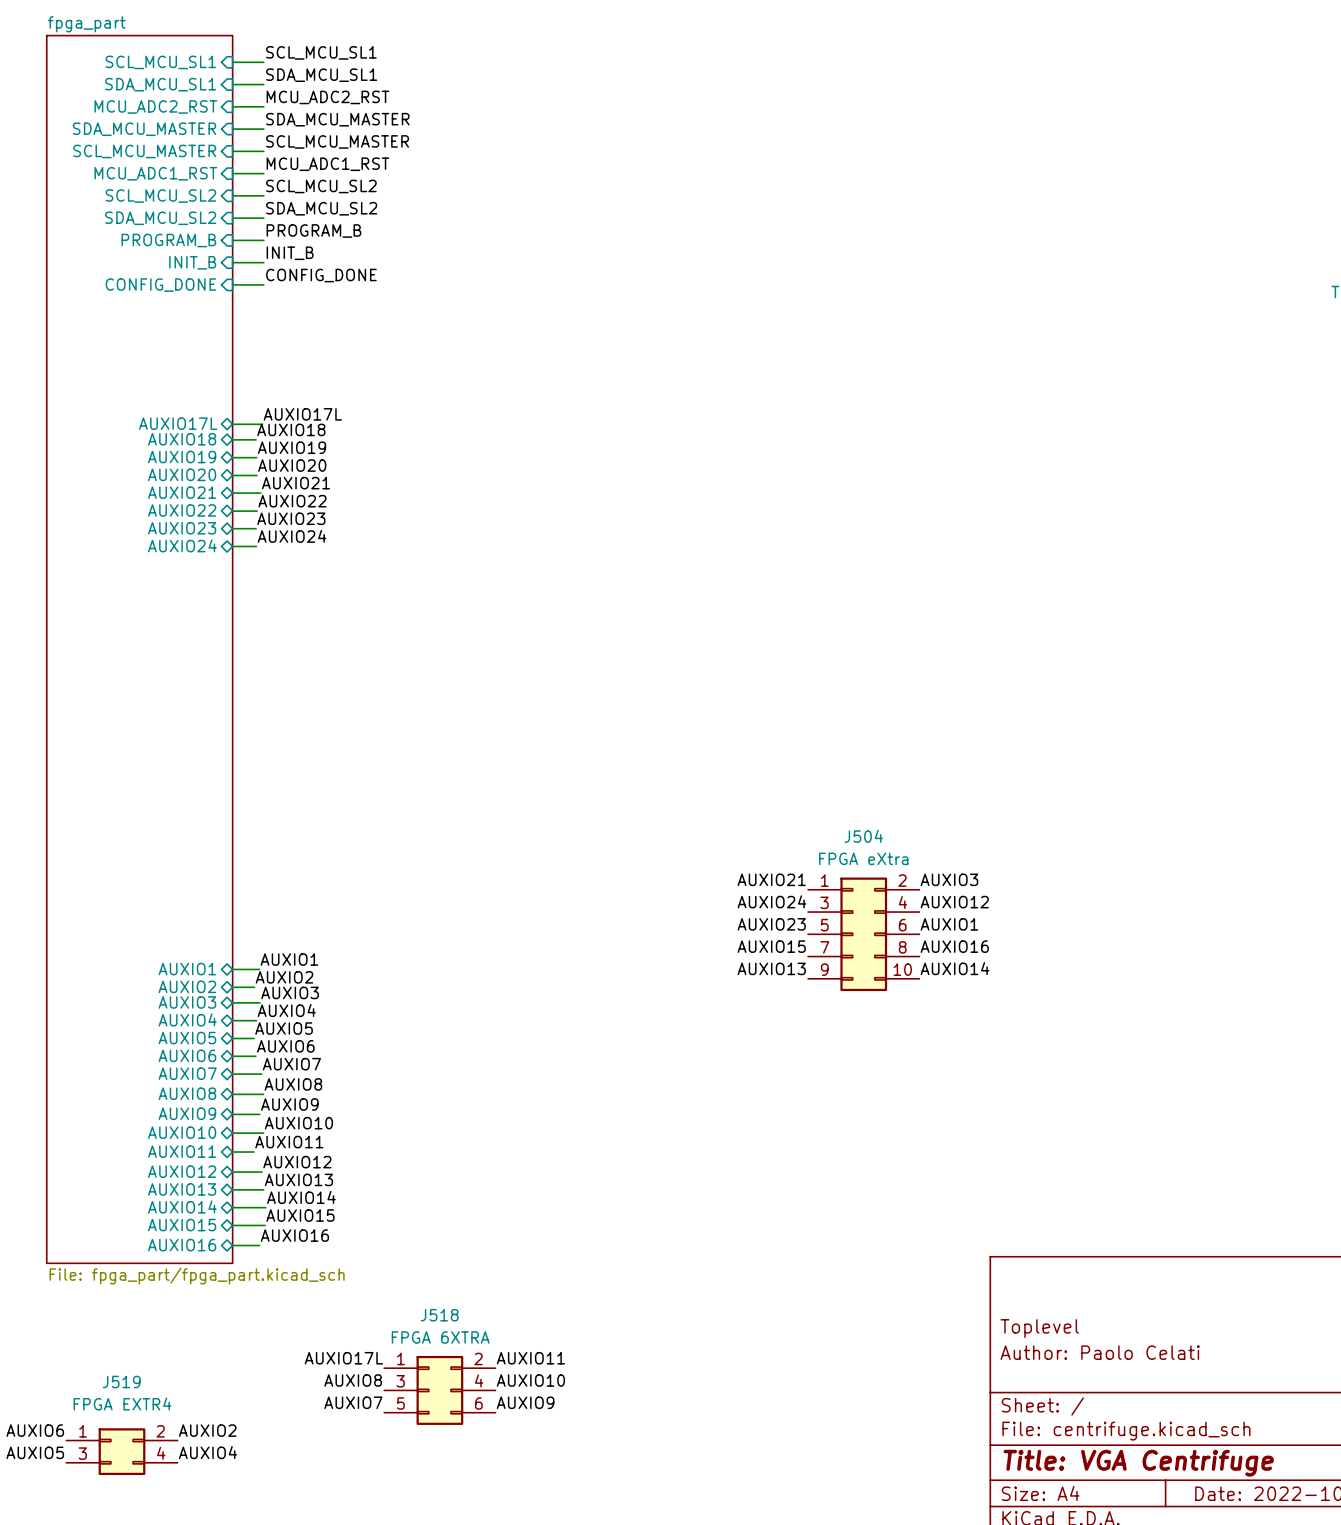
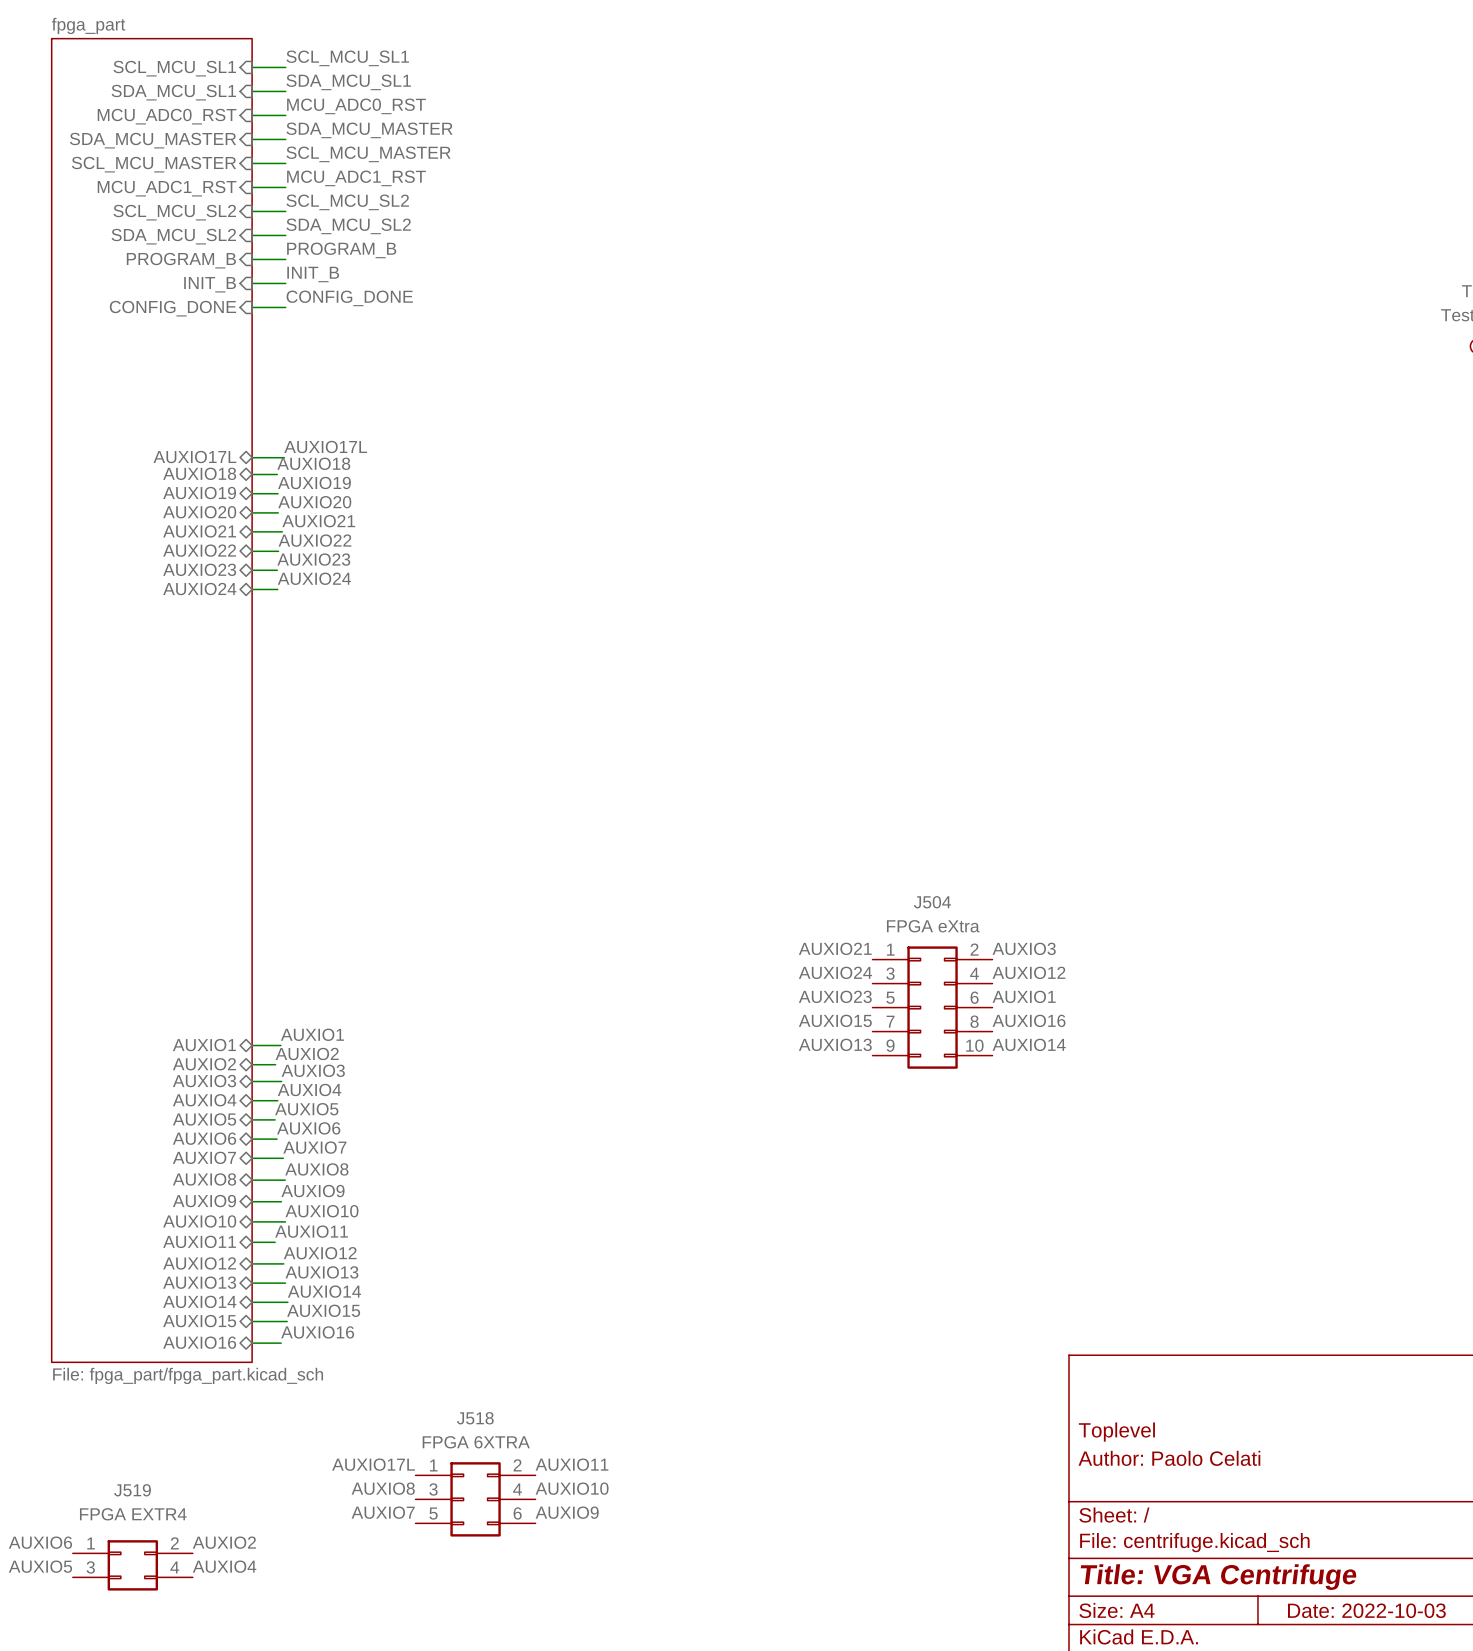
label: MCU_ADC2_RST (328, 97) -> MCU_ADC0_RST (356, 106)
sheet pin: MCU_ADC2_RST (155, 106) -> MCU_ADC0_RST (167, 116)

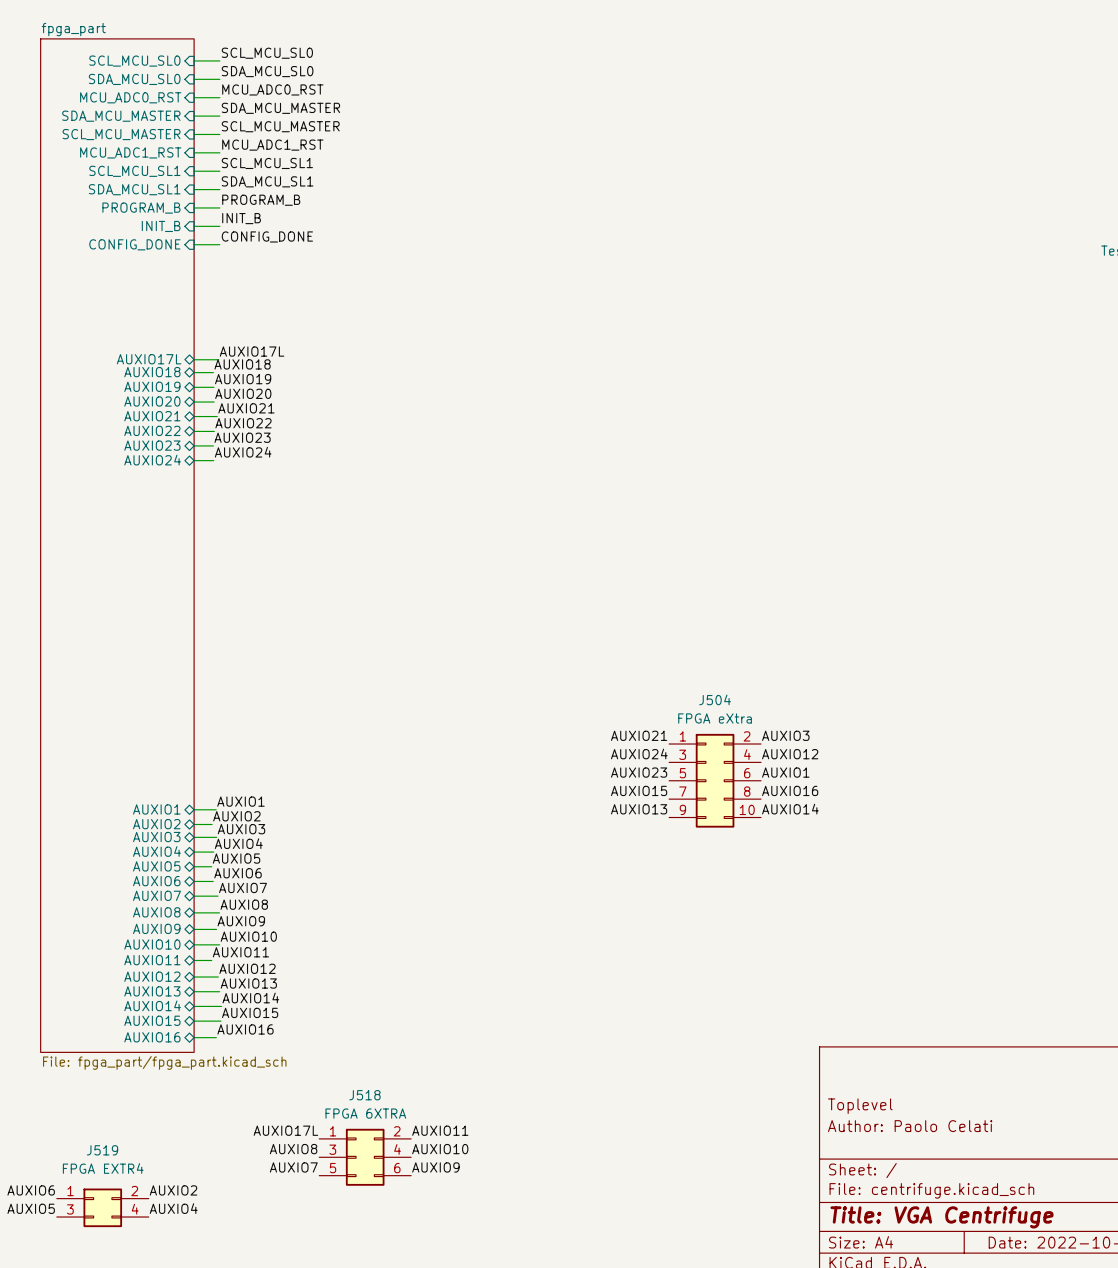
label: SCL_MCU_SL1 (347, 58) -> SCL_MCU_SL0 (267, 53)
sheet pin: SCL_MCU_SL1 (174, 68) -> SCL_MCU_SL0 (134, 61)
label: SDA_MCU_SL1 (348, 82) -> SDA_MCU_SL0 (267, 71)
sheet pin: SDA_MCU_SL1 (173, 92) -> SDA_MCU_SL0 (134, 79)
label: SCL_MCU_SL2 (347, 202) -> SCL_MCU_SL1 (267, 163)
sheet pin: SCL_MCU_SL2 (174, 212) -> SCL_MCU_SL1 (134, 171)
label: SDA_MCU_SL2 (348, 226) -> SDA_MCU_SL1 (267, 181)
sheet pin: SDA_MCU_SL2 (173, 236) -> SDA_MCU_SL1 (134, 189)

